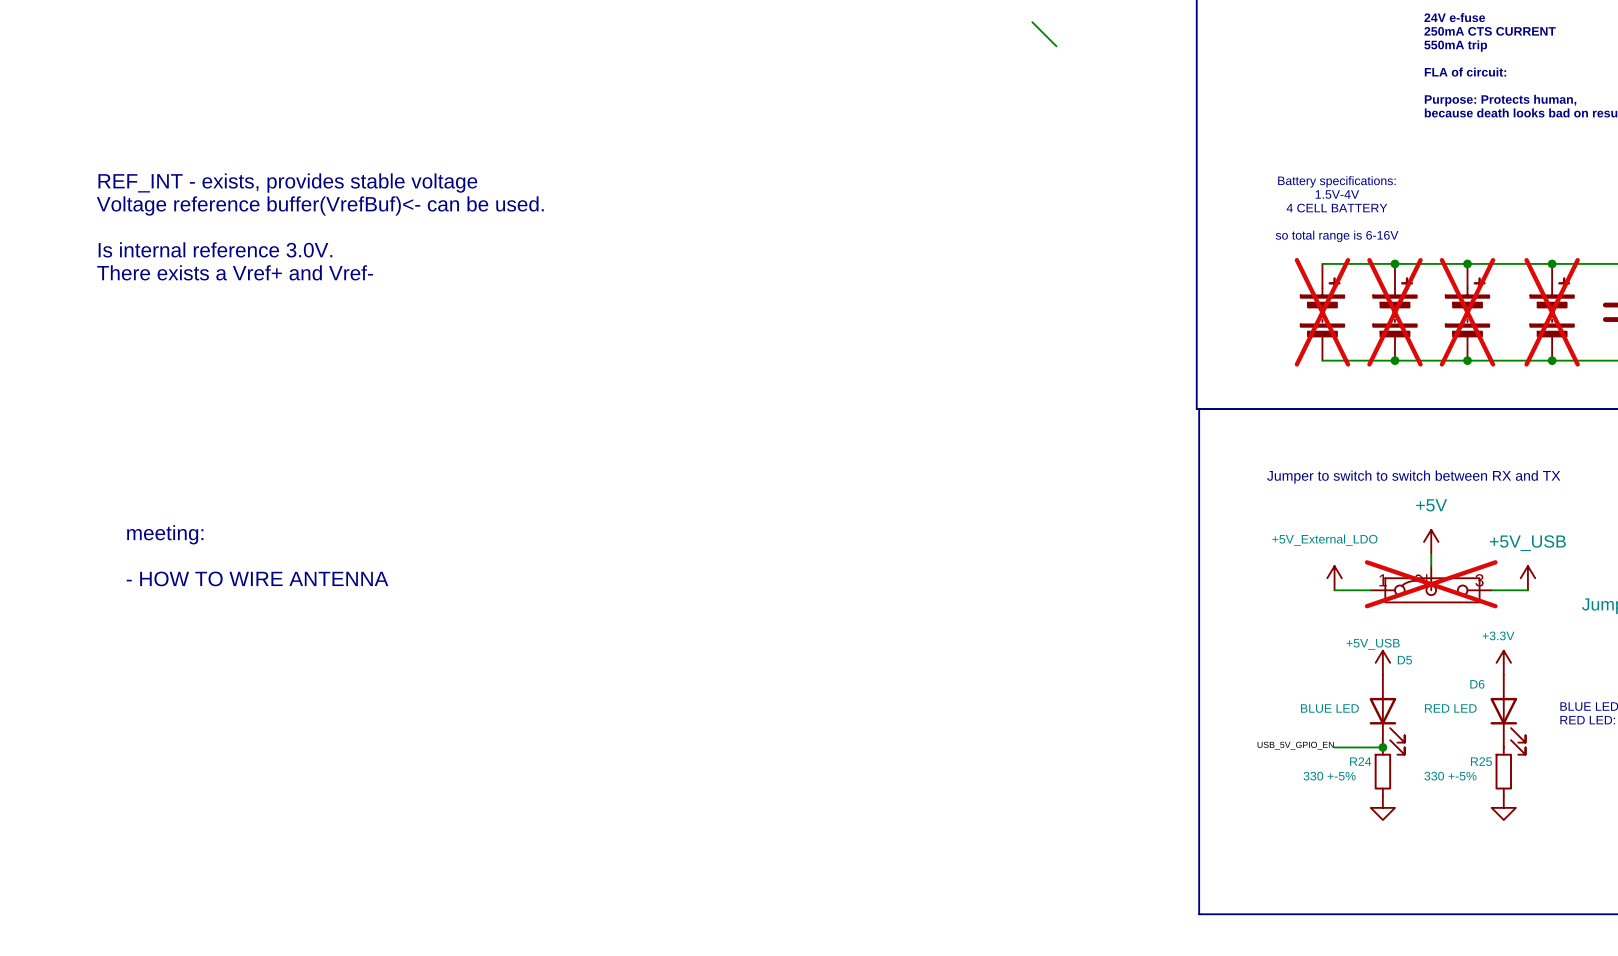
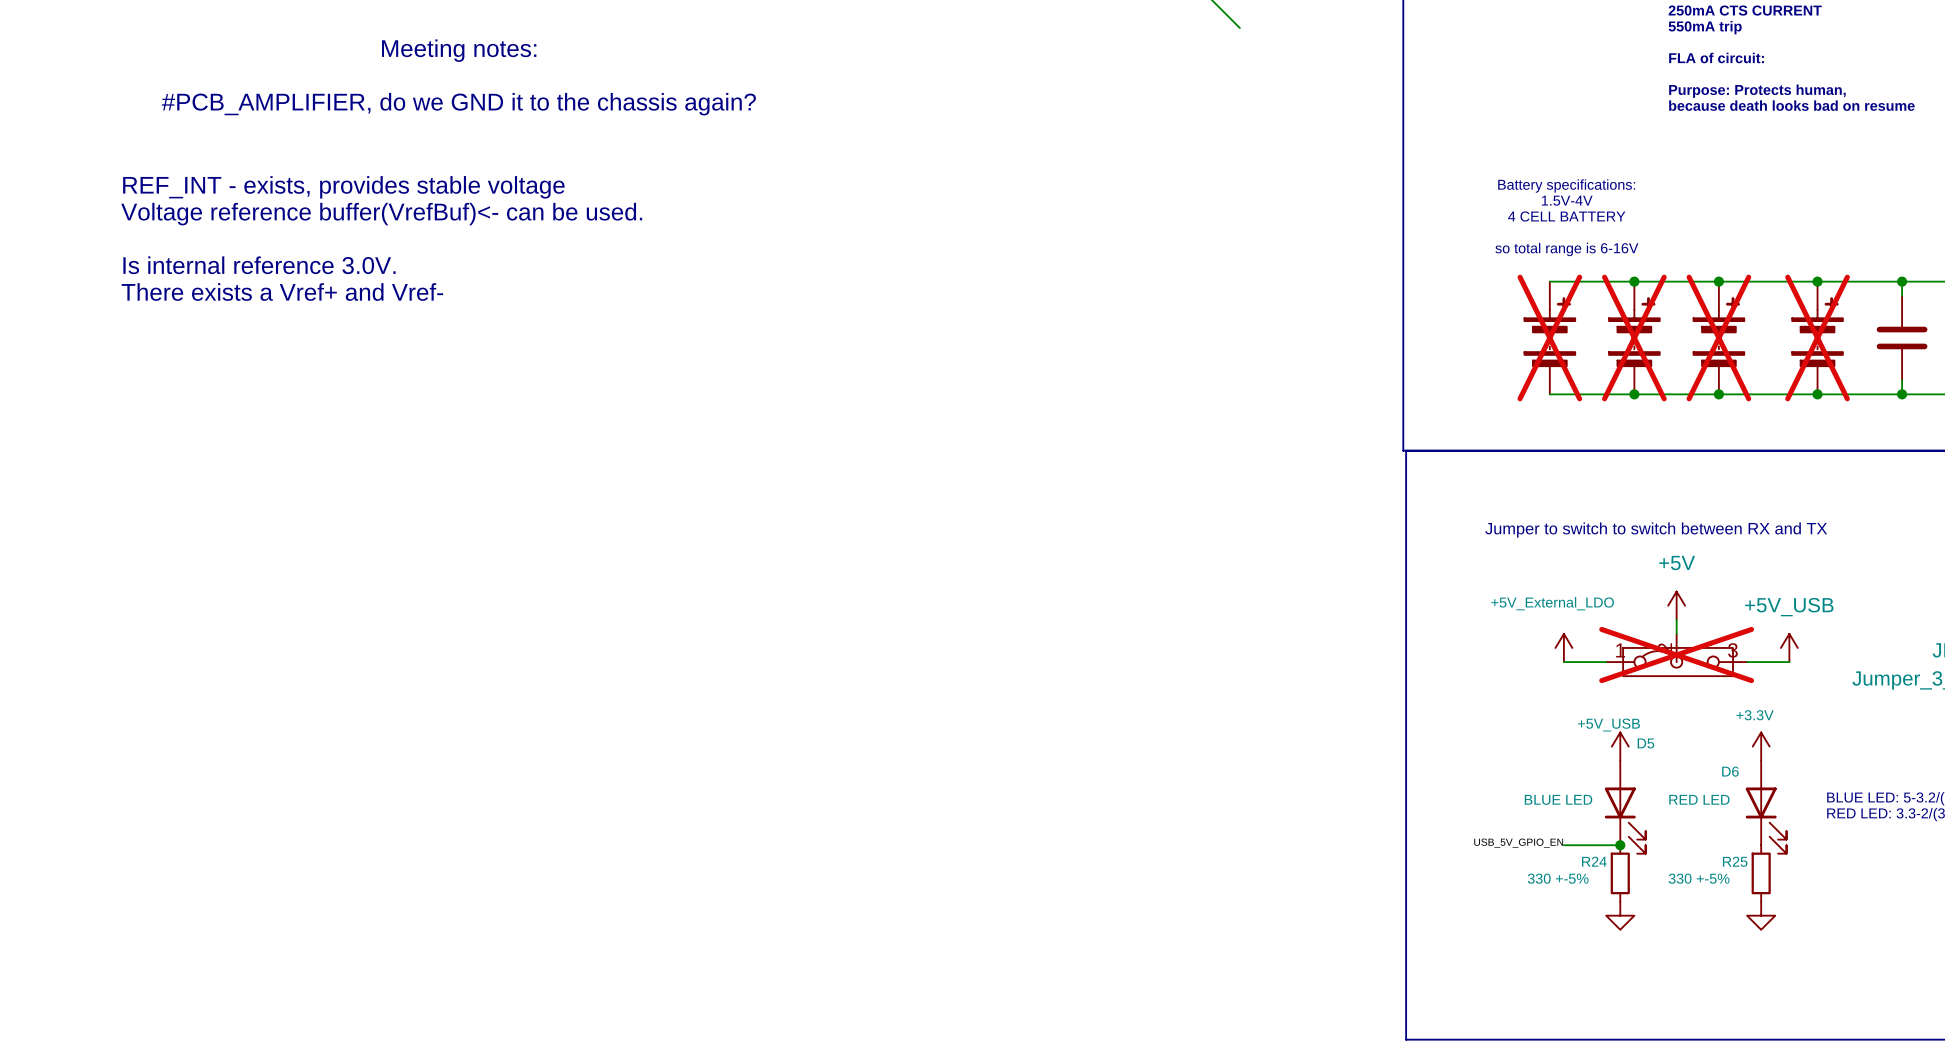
text: none -> Meeting notes: (459, 50)
text: none -> #PCB_AMPLIFIER, do we GND it to the chassis again? (458, 104)
text: meeting: (165, 534) -> none
text: - HOW TO WIRE ANTENNA (257, 578) -> none

